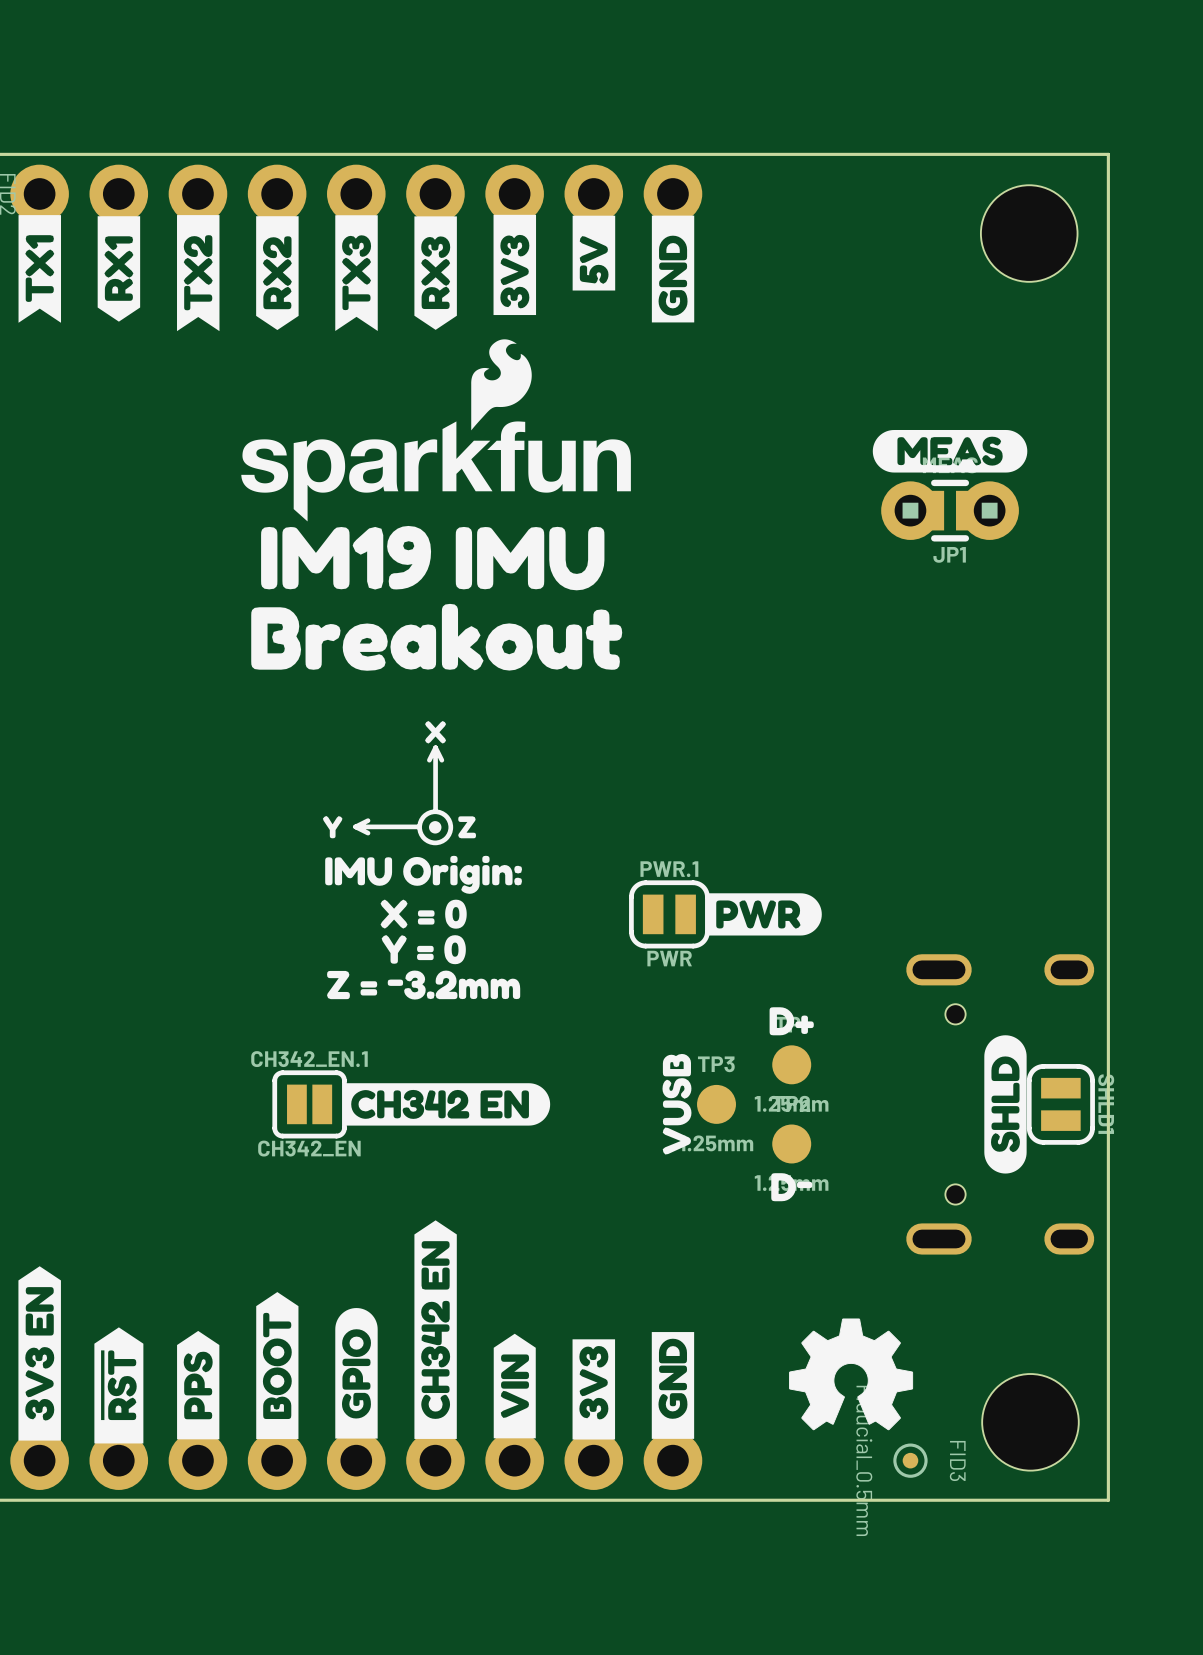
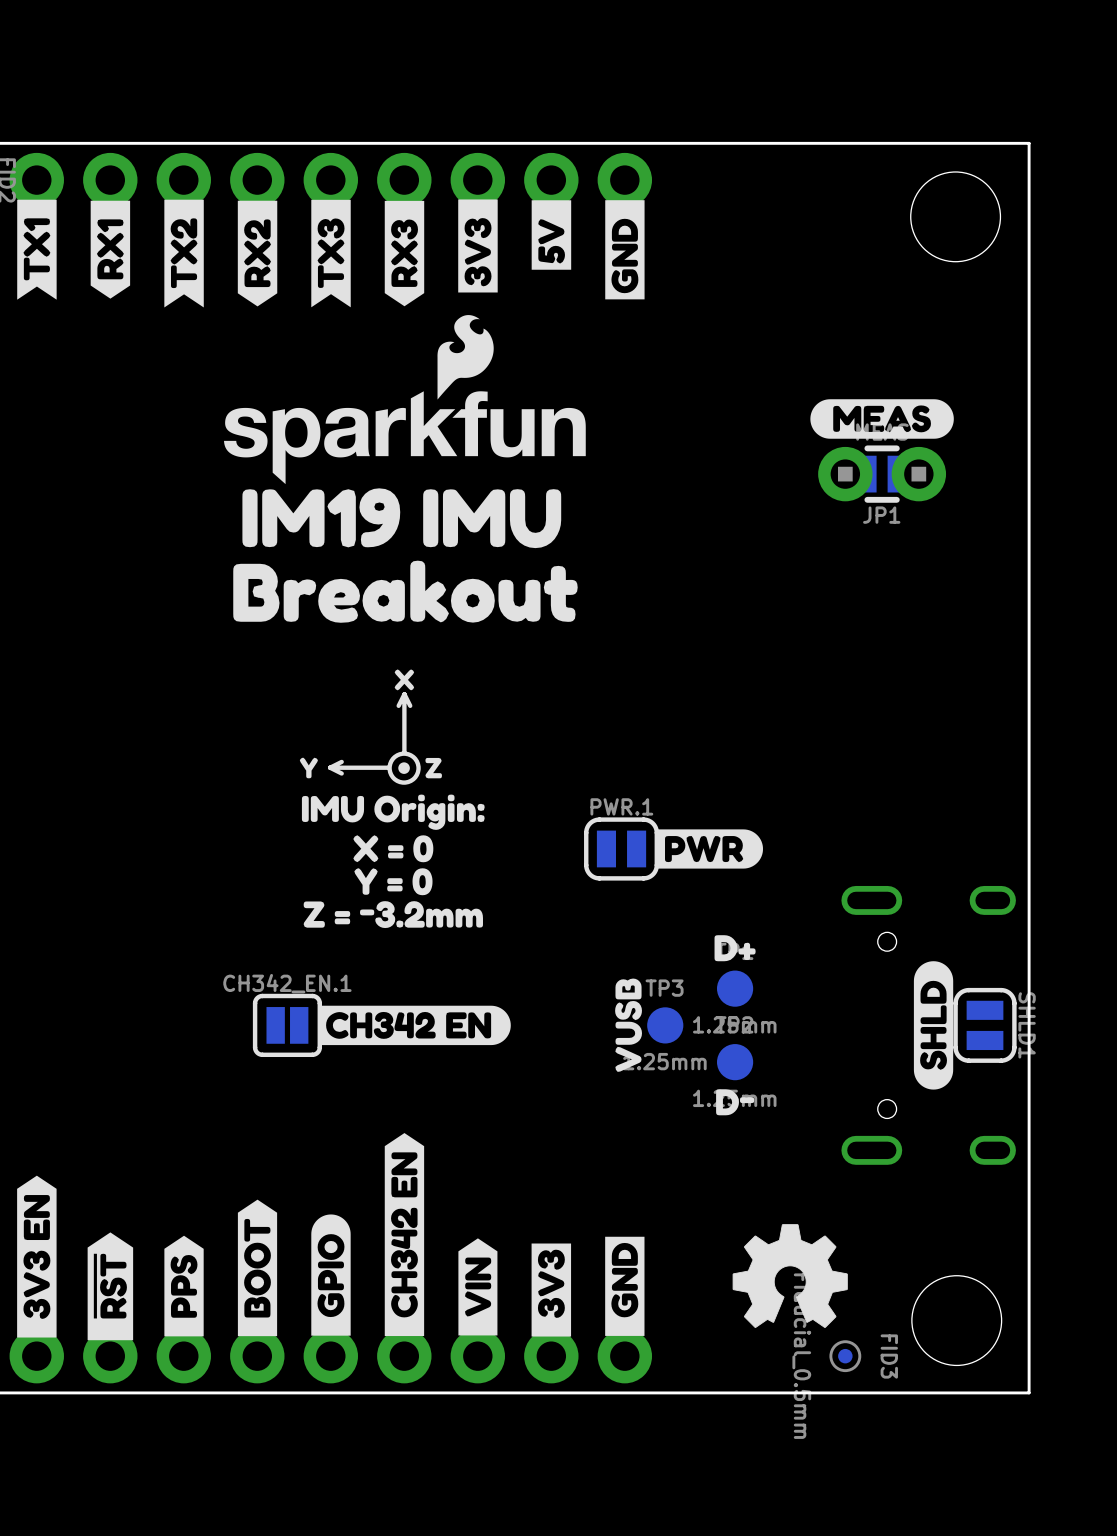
PWR.1 value: PWR (669, 958) -> none
CH342_EN.1 value: CH342_EN (309, 1148) -> none

